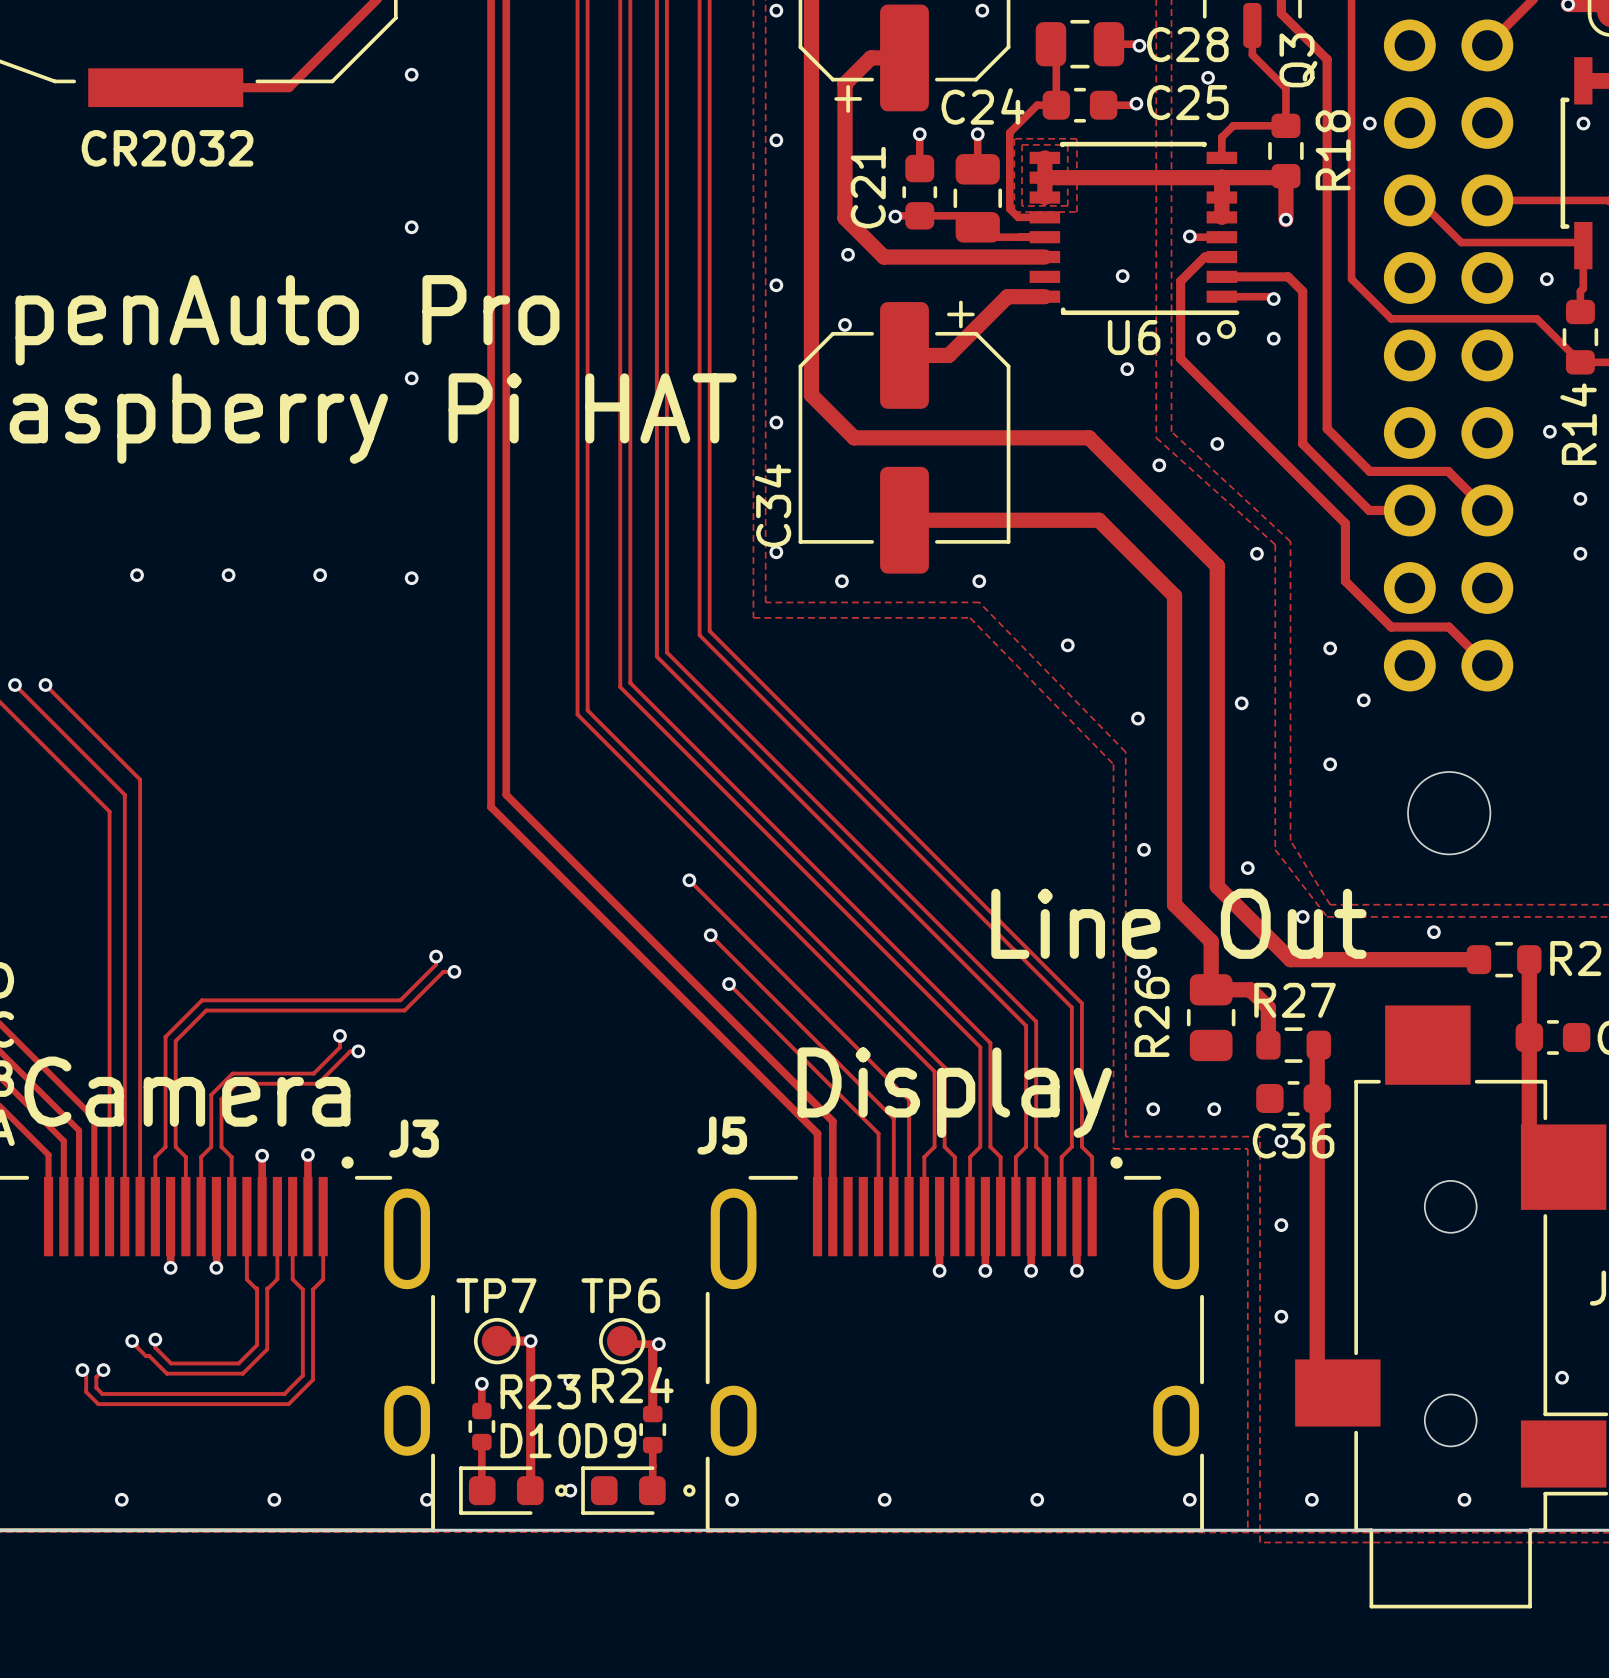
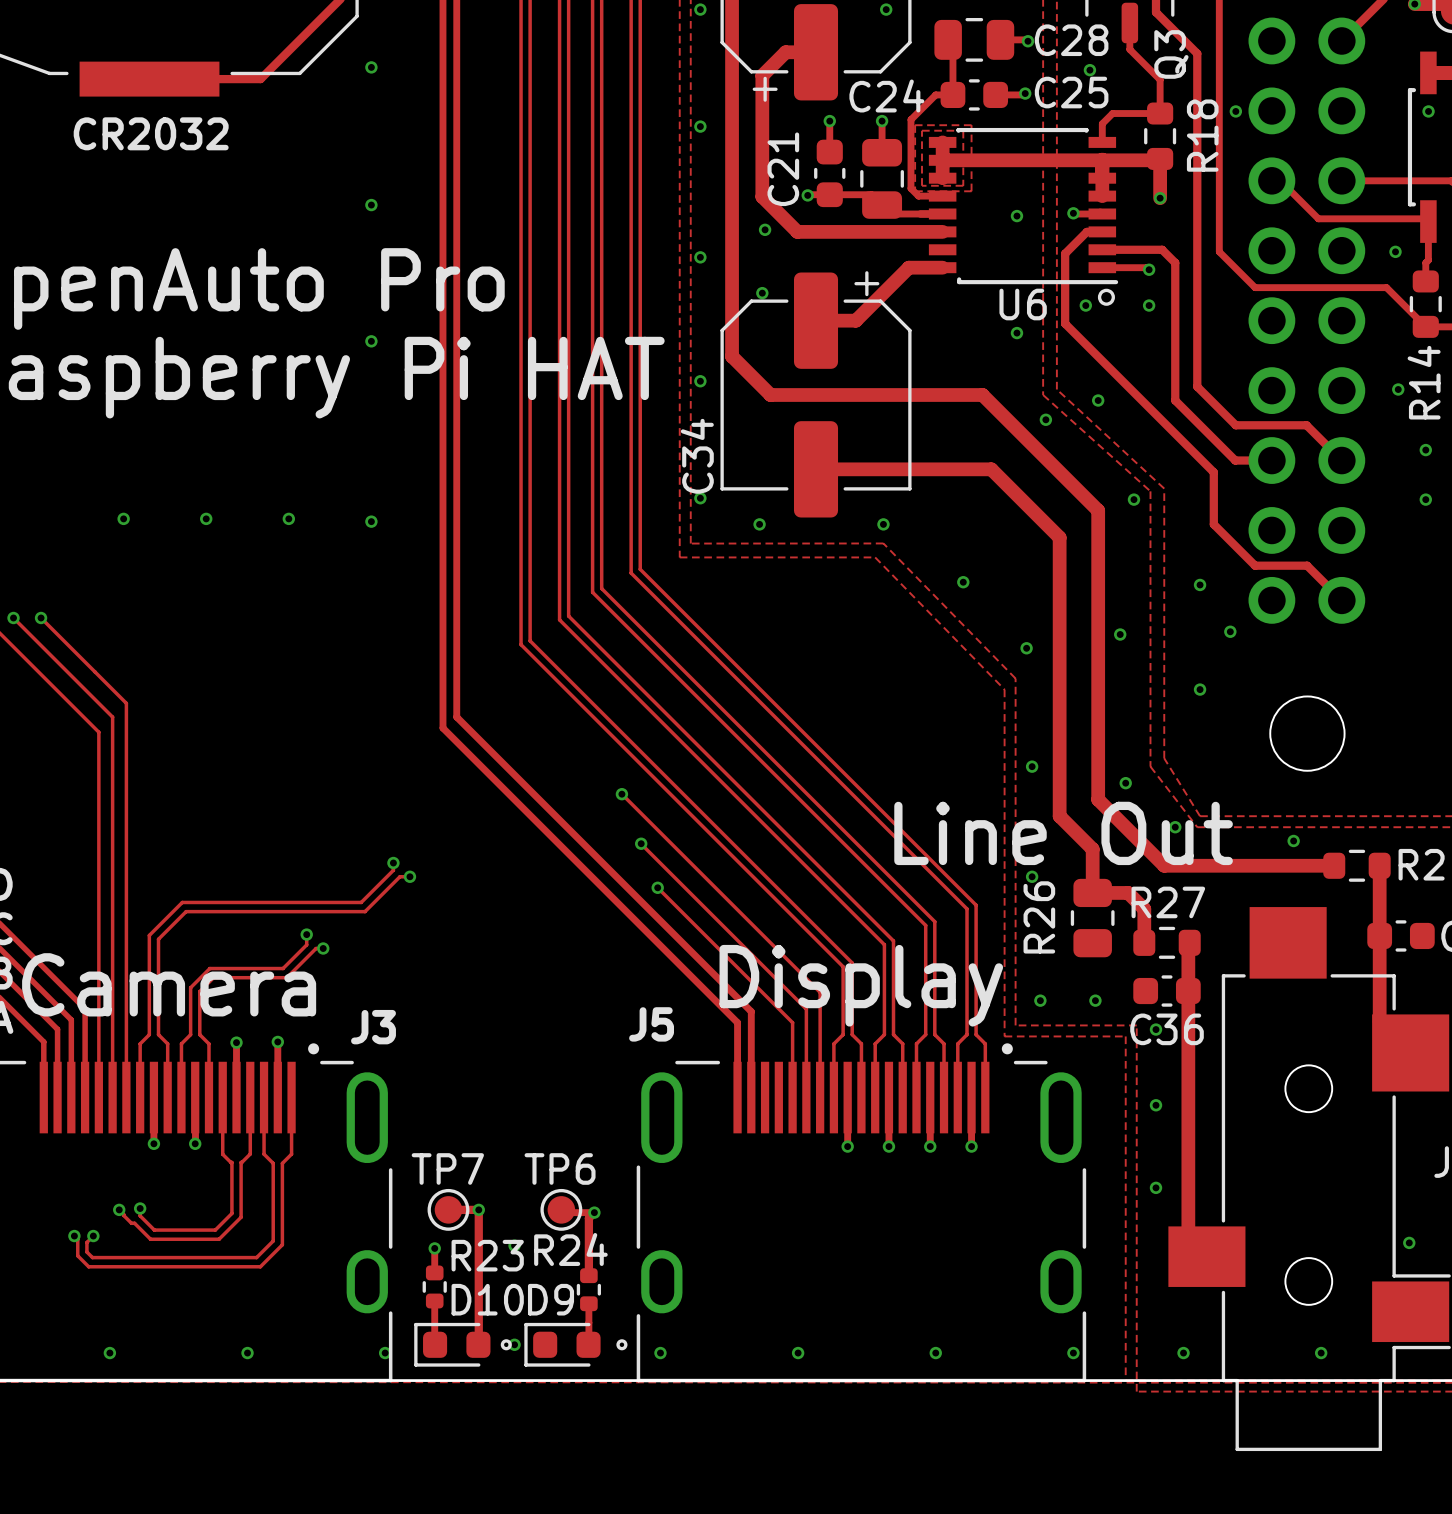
via position: (1122, 276) -> (1016, 216)

